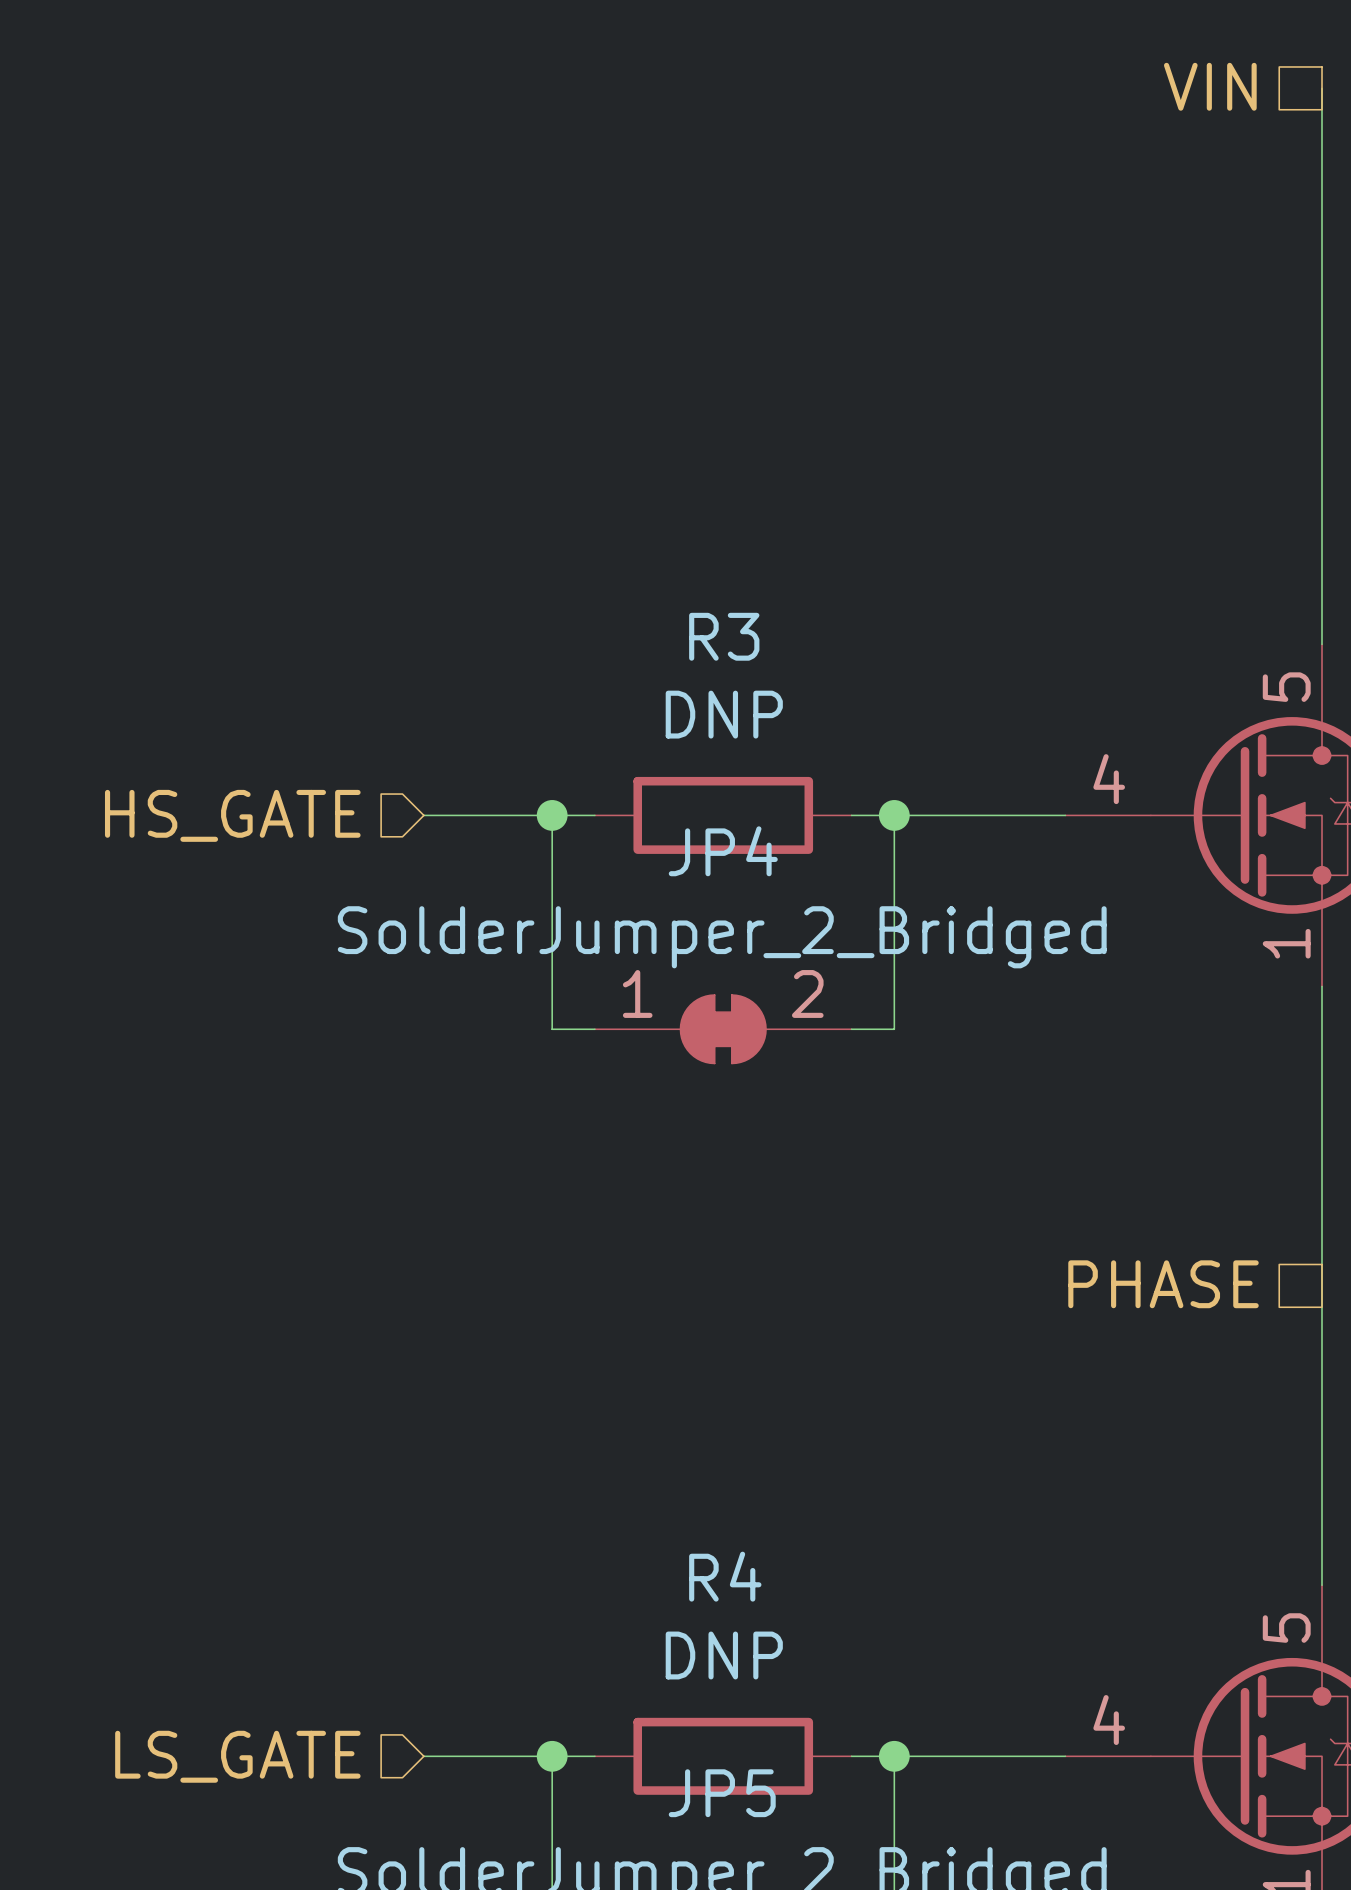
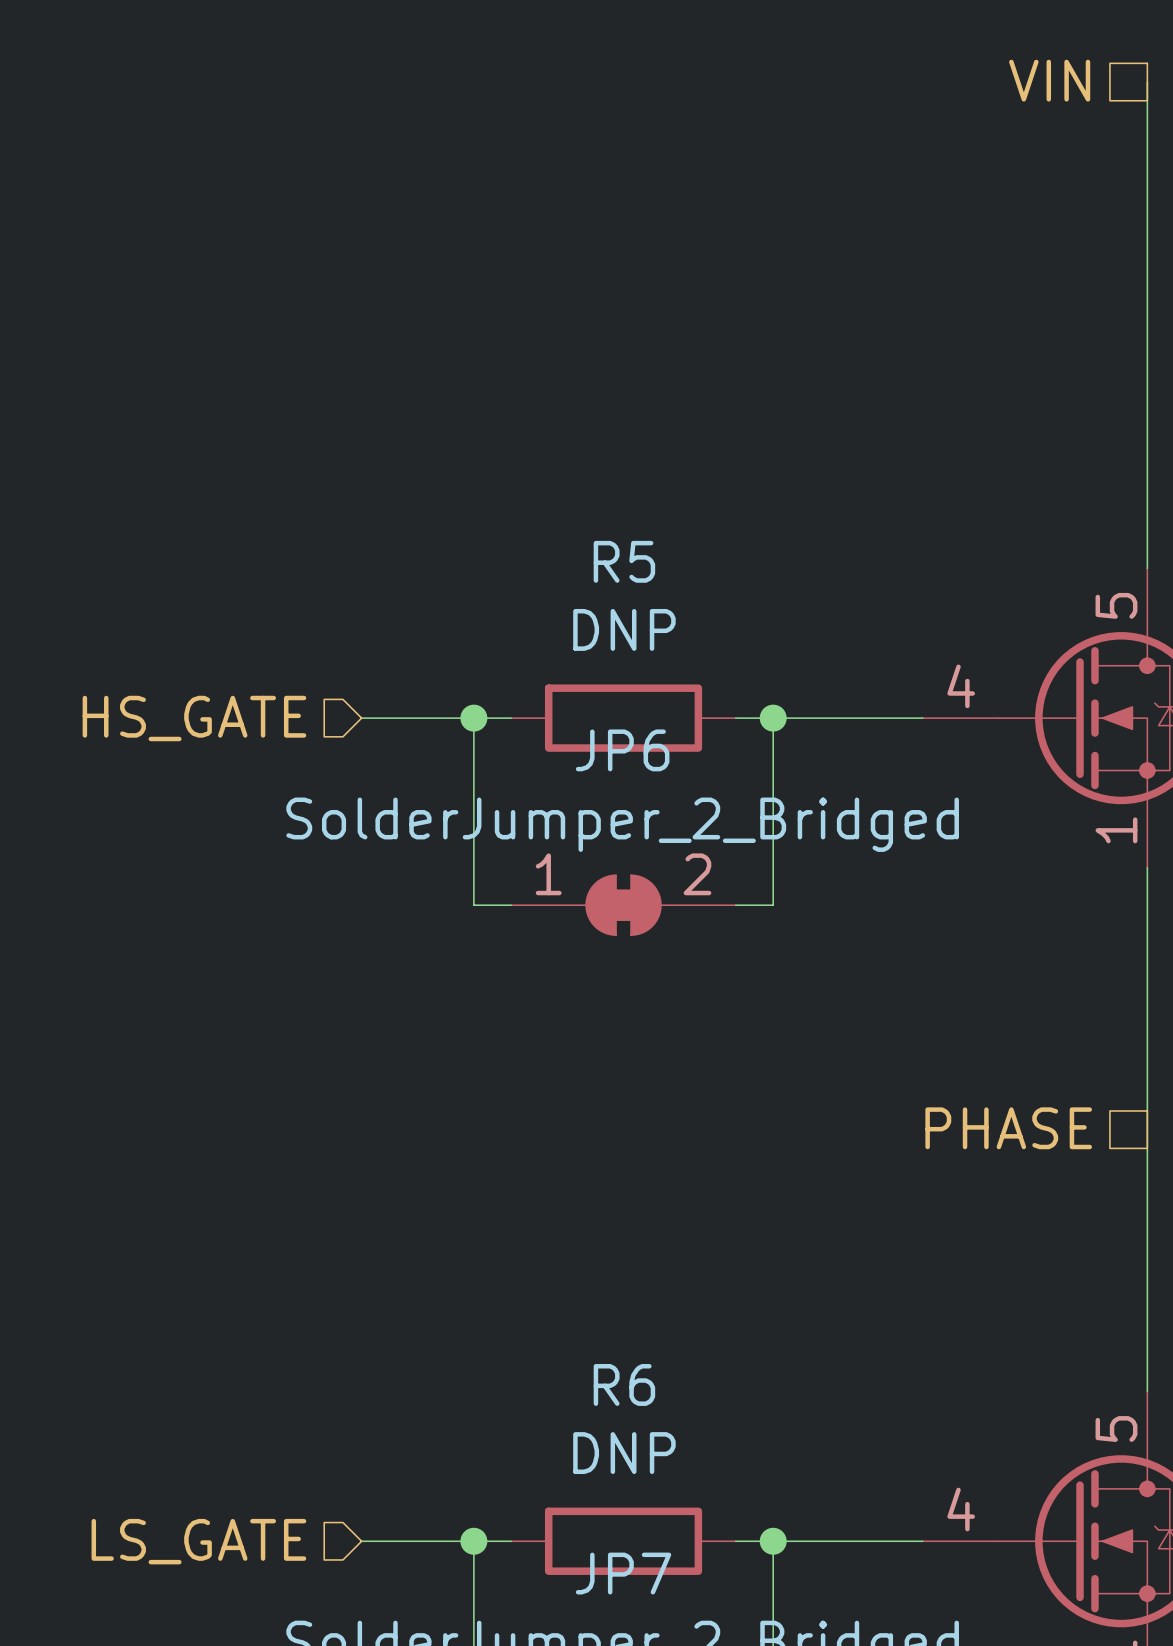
R3 name: R3 (724, 636) -> R5 (624, 561)
JP4 name: JP4 (723, 851) -> JP6 (622, 750)
R4 name: R4 (725, 1576) -> R6 (624, 1384)
JP5 name: JP5 (722, 1793) -> JP7 (623, 1573)

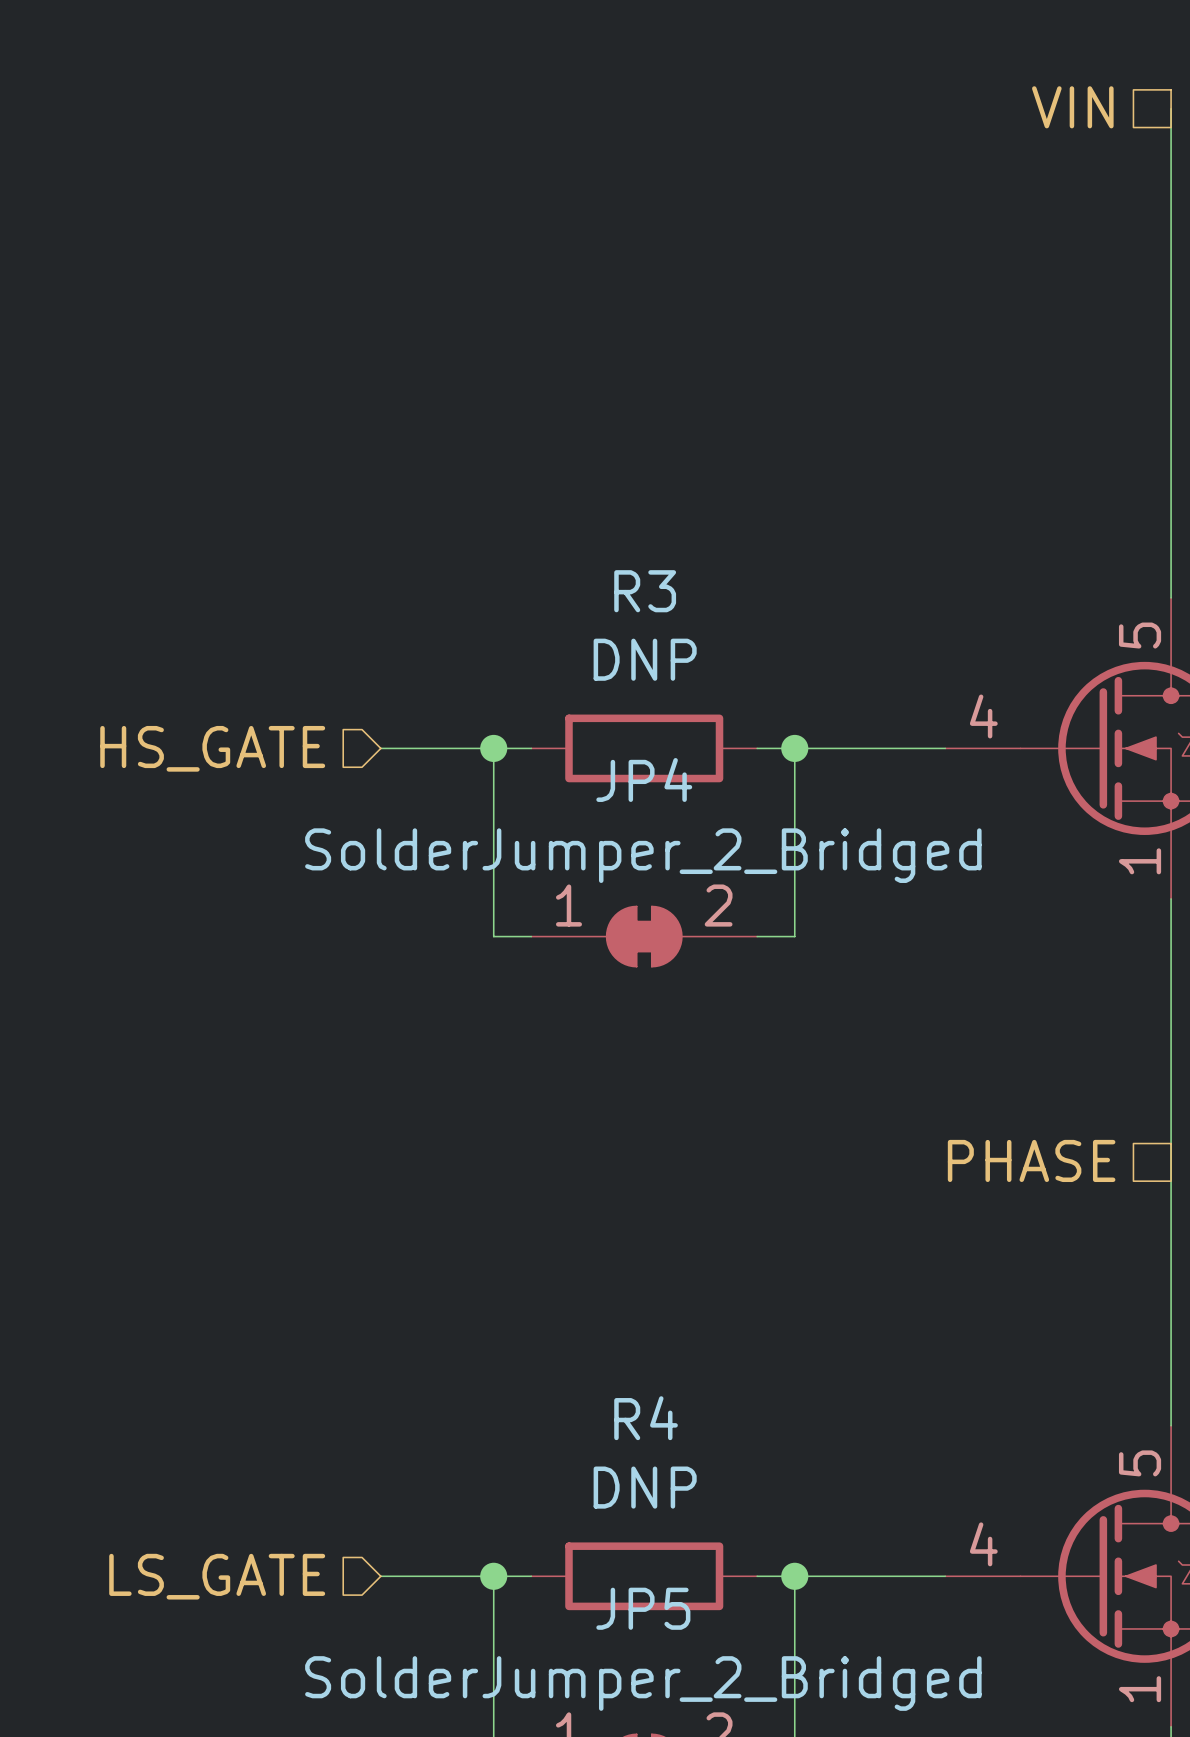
R5 name: R5 (624, 561) -> R3 (645, 591)
JP6 name: JP6 (622, 750) -> JP4 (644, 779)
R6 name: R6 (624, 1384) -> R4 (646, 1418)
JP7 name: JP7 (623, 1573) -> JP5 (643, 1608)

